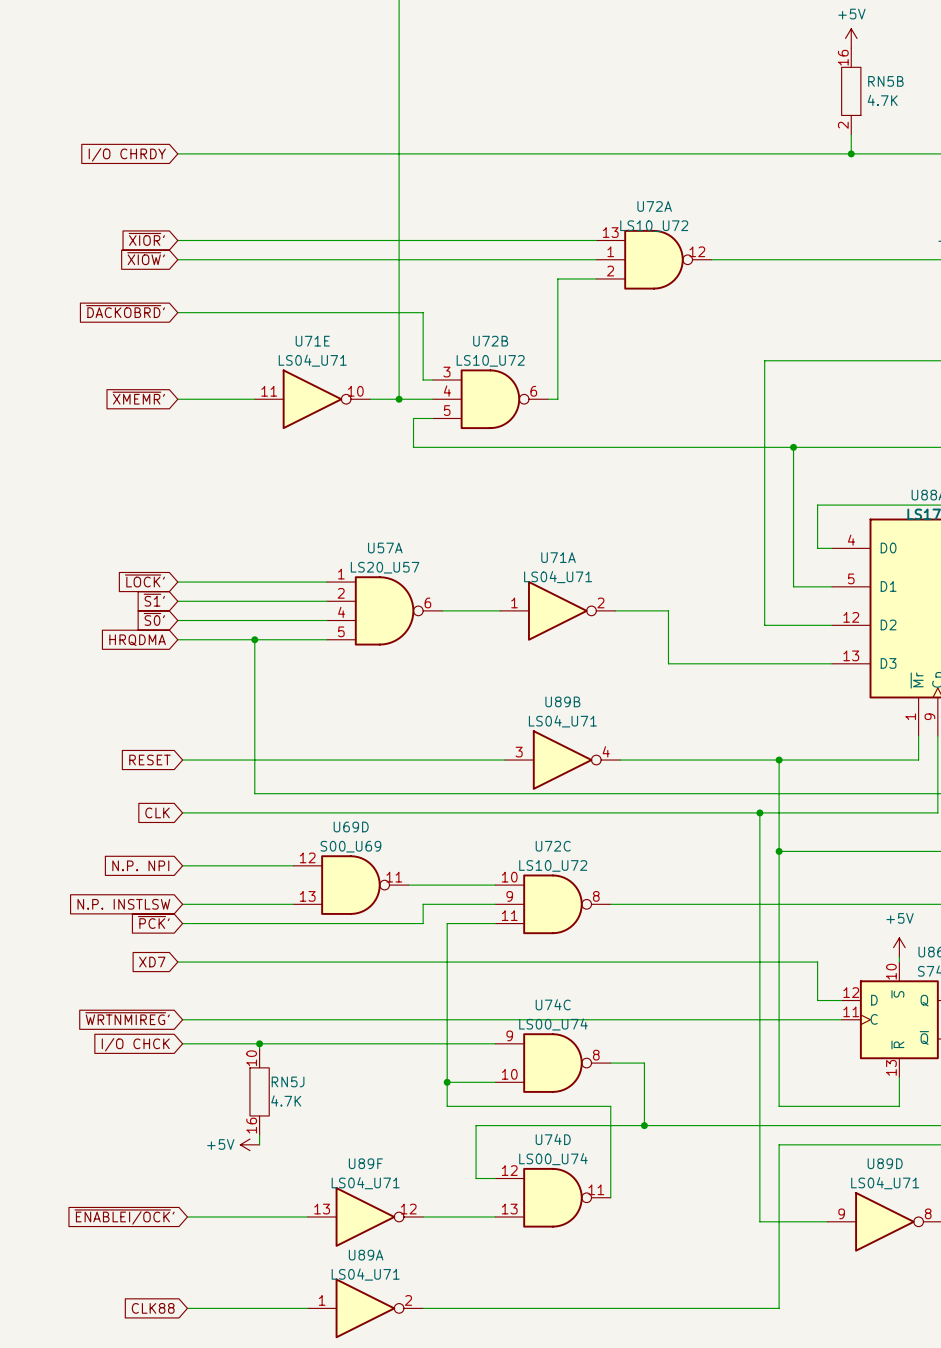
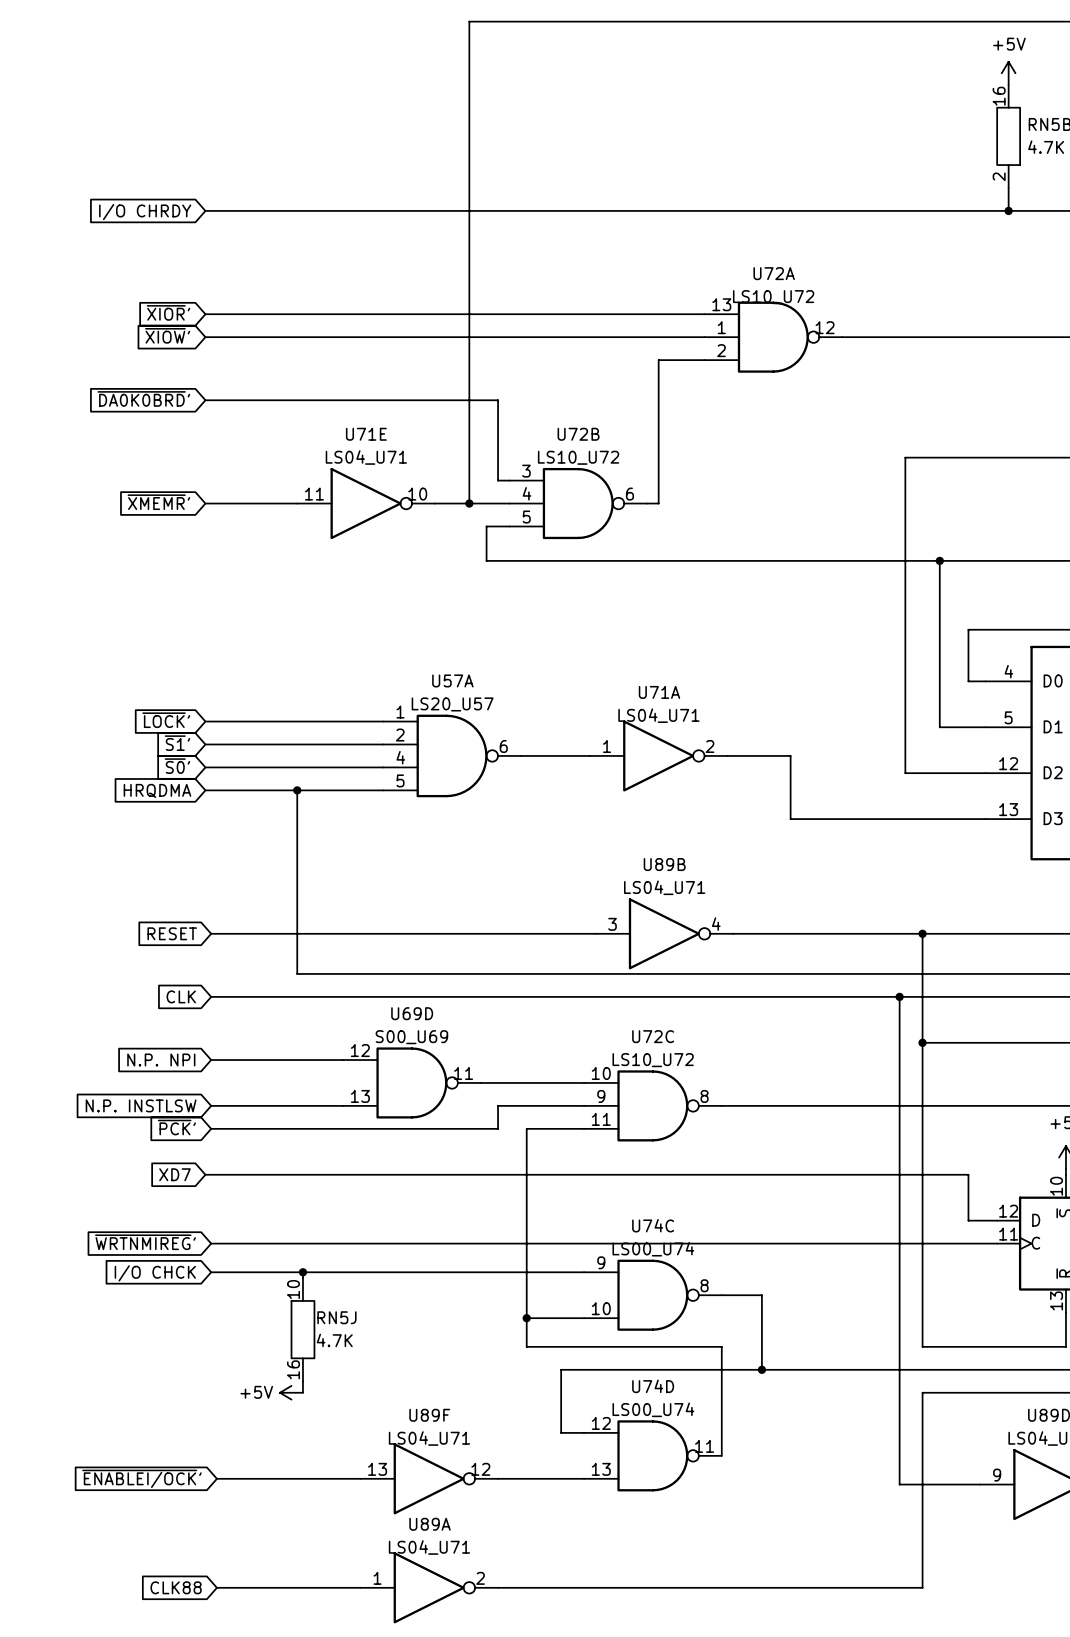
global label: ~{DACKOBRD}' (125, 311) -> ~{DA0K0BRD}' (143, 398)

